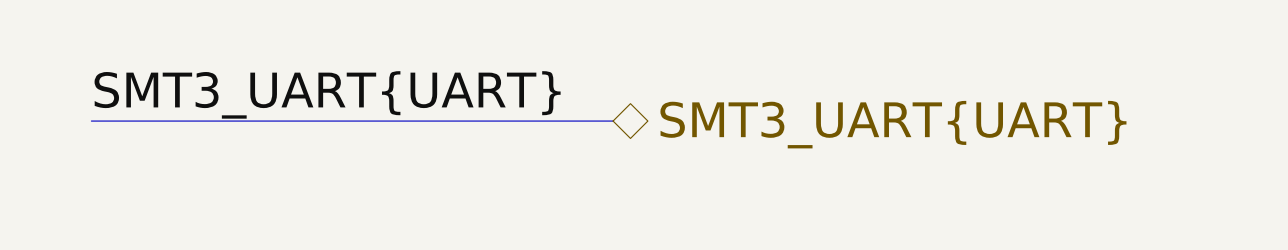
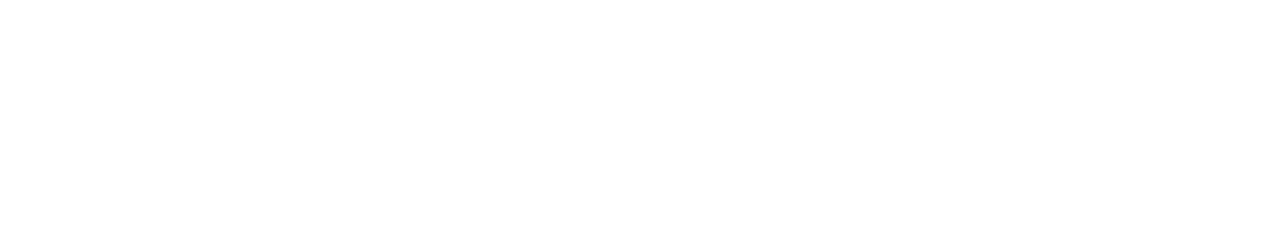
label: SMT3_UART{UART} (327, 94) -> none
bus: (91, 121) (613, 121) -> none
hierarchical label: SMT3_UART{UART} (893, 124) -> none

